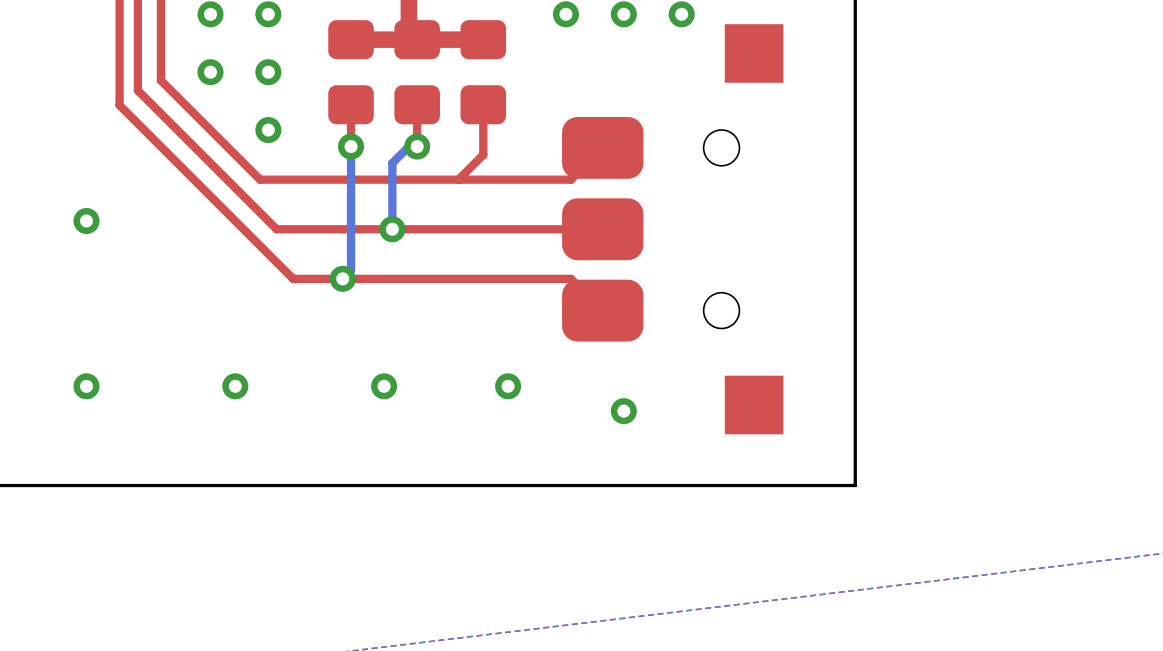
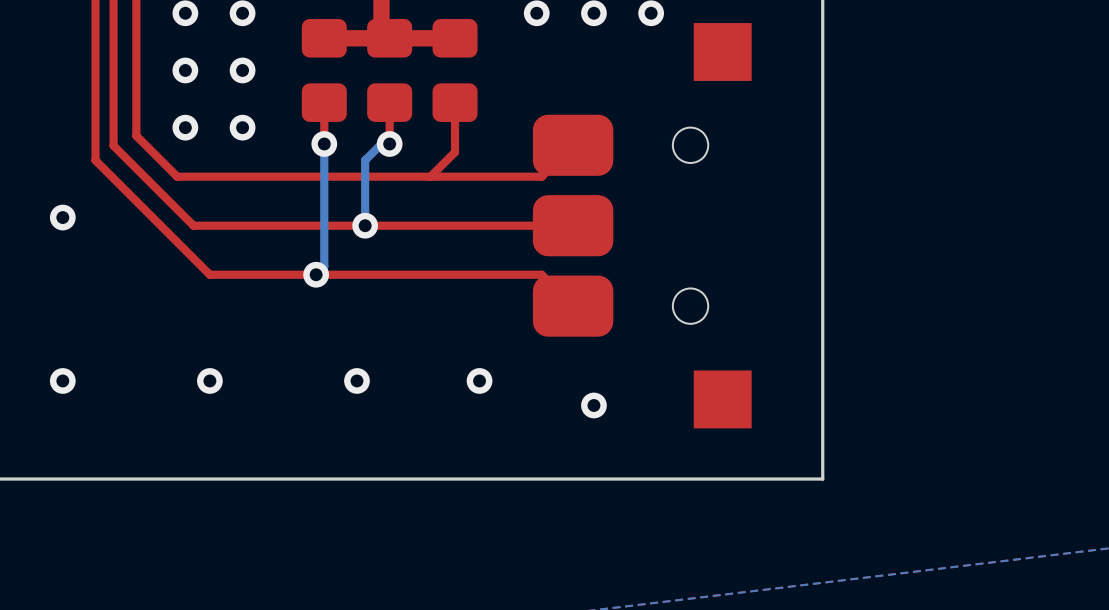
top track: (160, 80) (260, 179) -> (136, 78) (136, 135) (177, 176) (234, 176)
top track: (137, 90) (276, 229) -> (113, 88) (113, 145) (193, 225) (250, 225)
top track: (119, 105) (293, 278) -> (95, 103) (95, 160) (209, 274) (267, 274)
via: none -> (185, 127)

